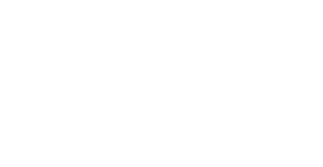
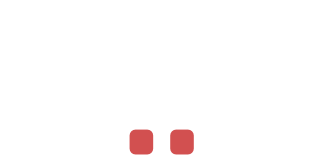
part: none -> (161, 142)

